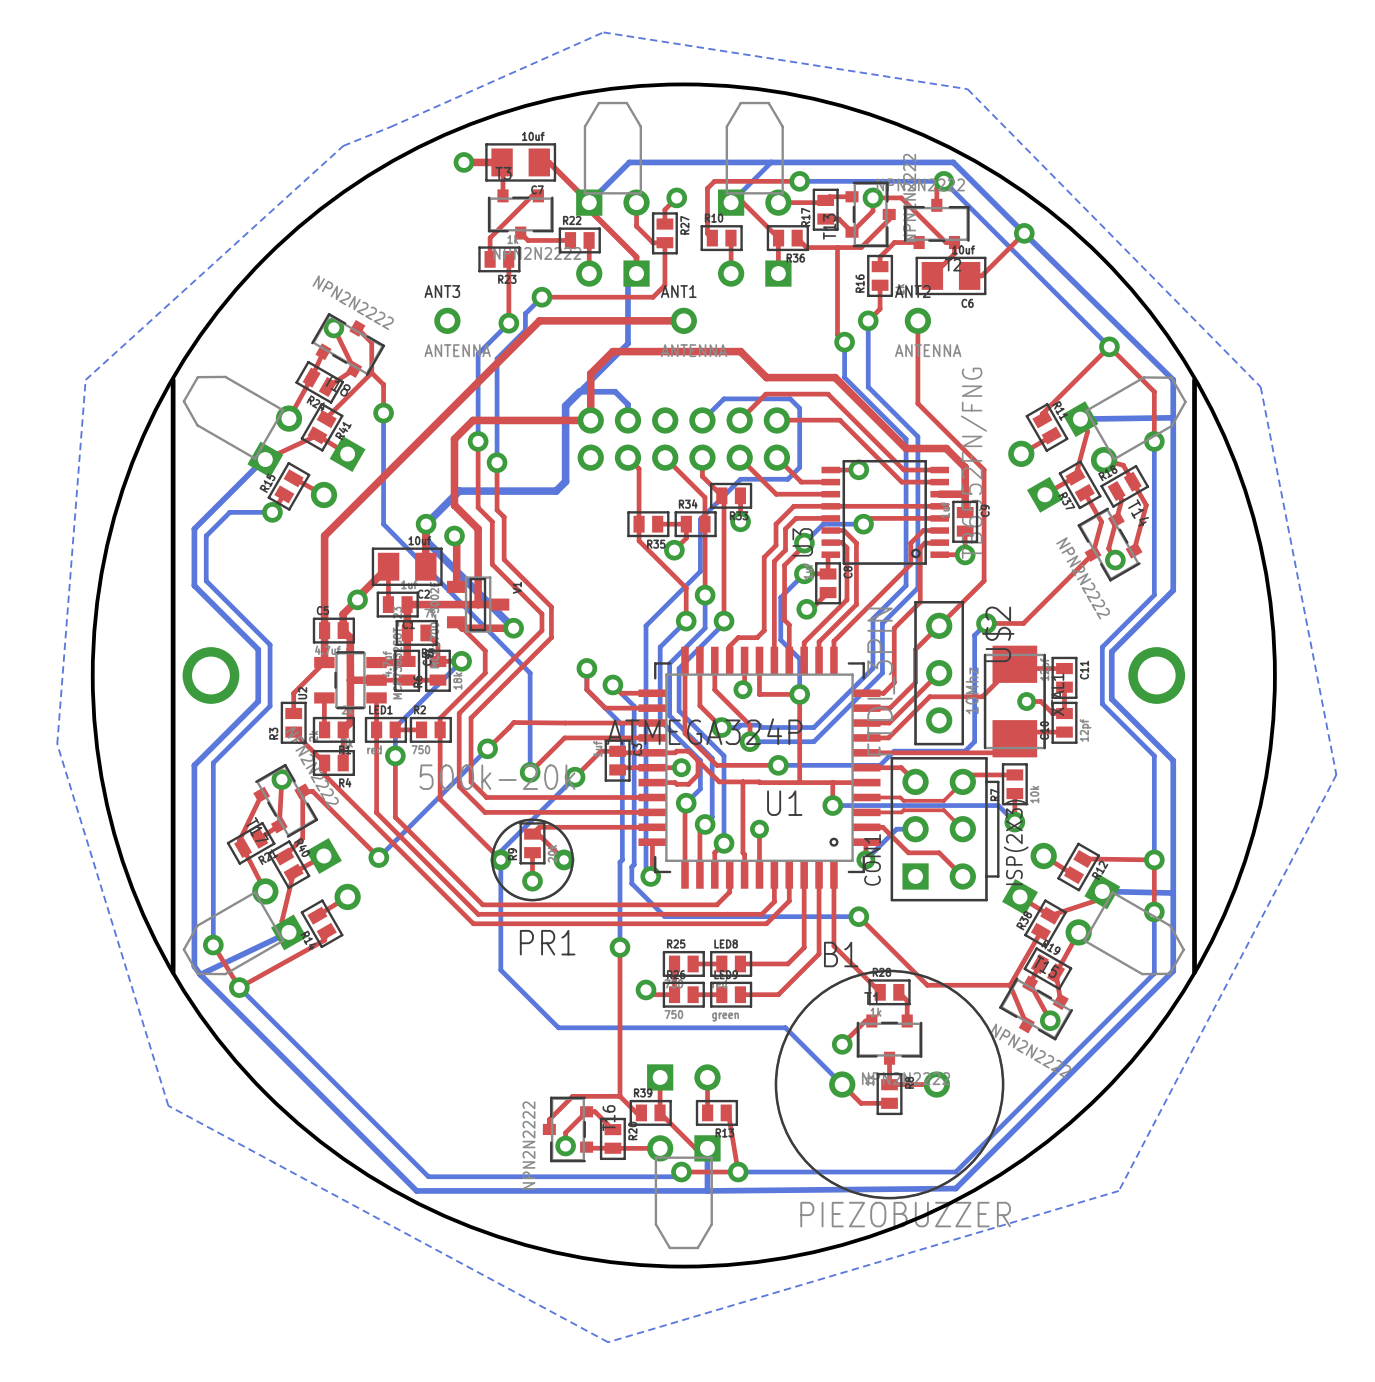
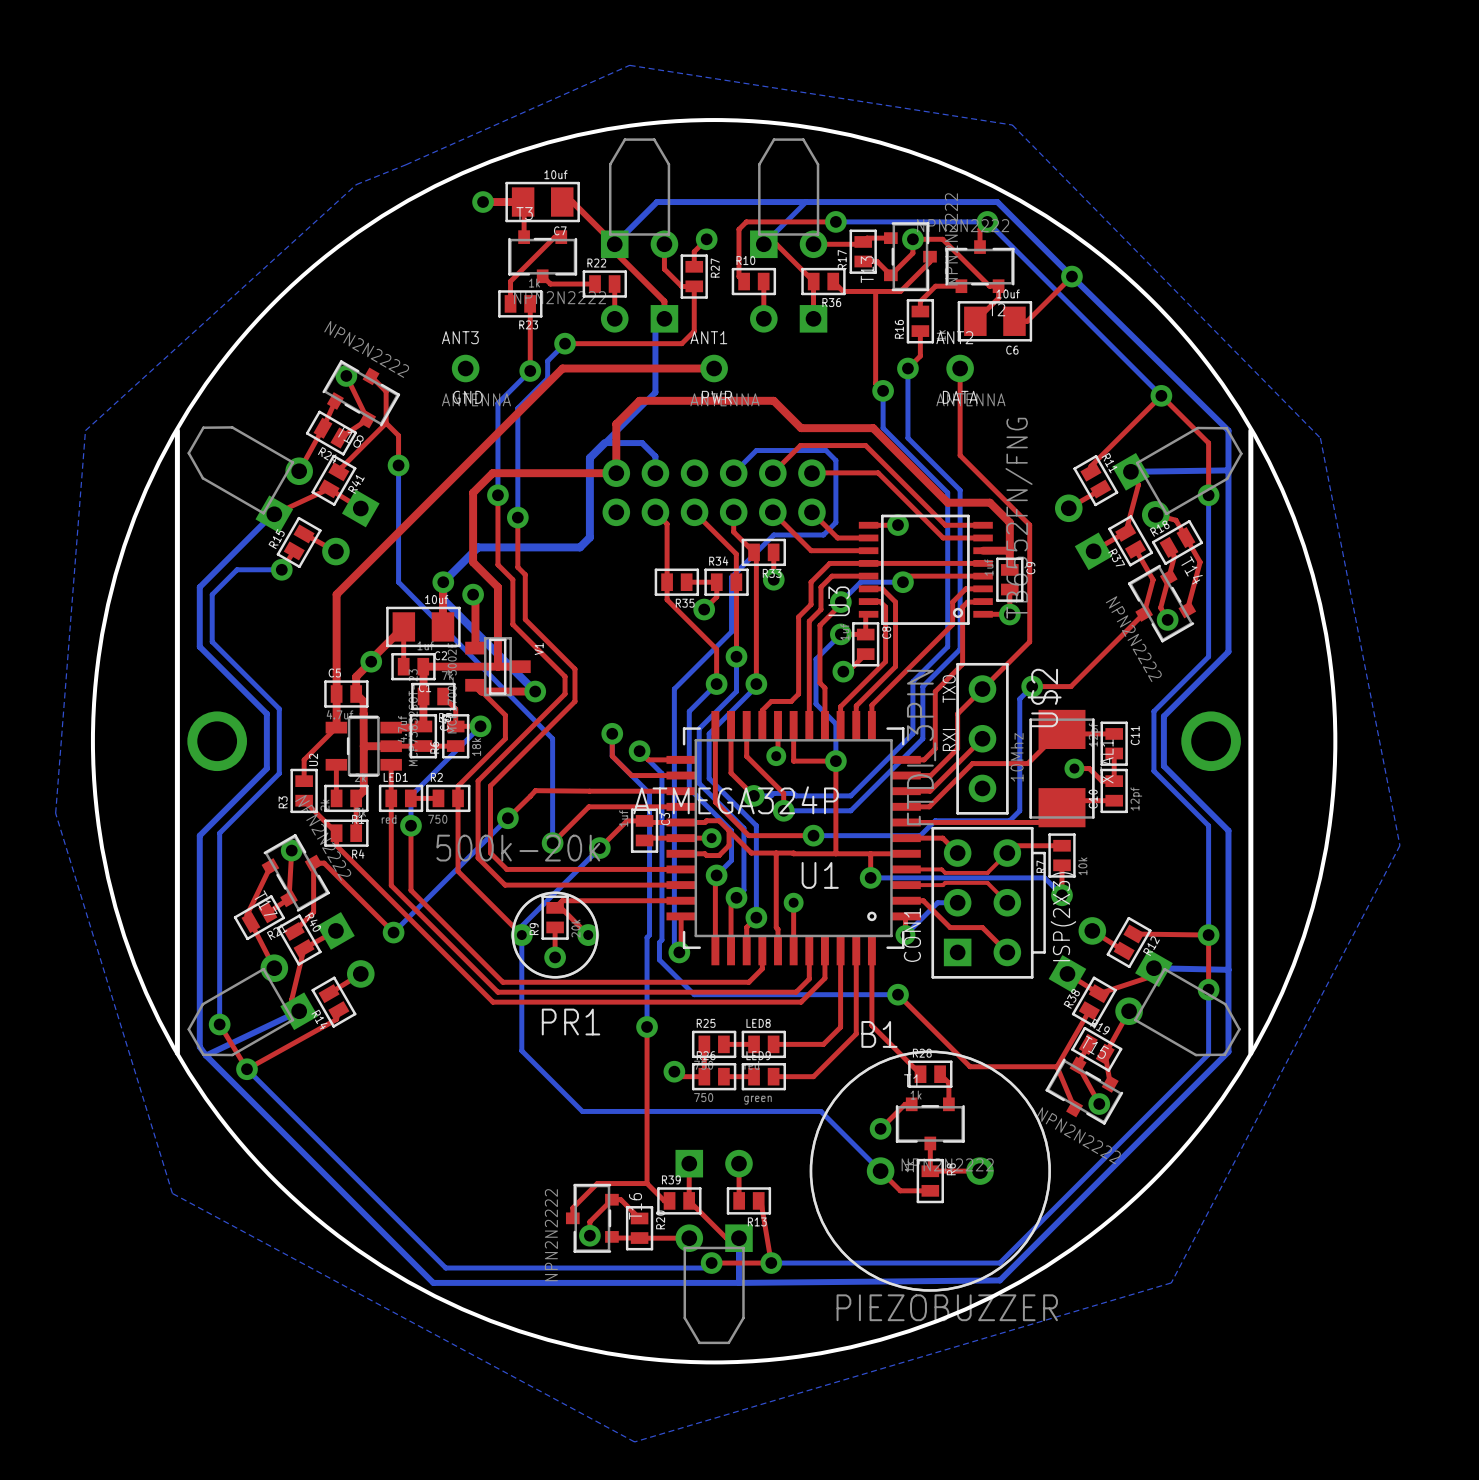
text: none -> GND (467, 397)
text: none -> PWR (716, 397)
text: none -> DATA (960, 397)
text: none -> TXO (949, 689)
text: none -> RXI (949, 739)

